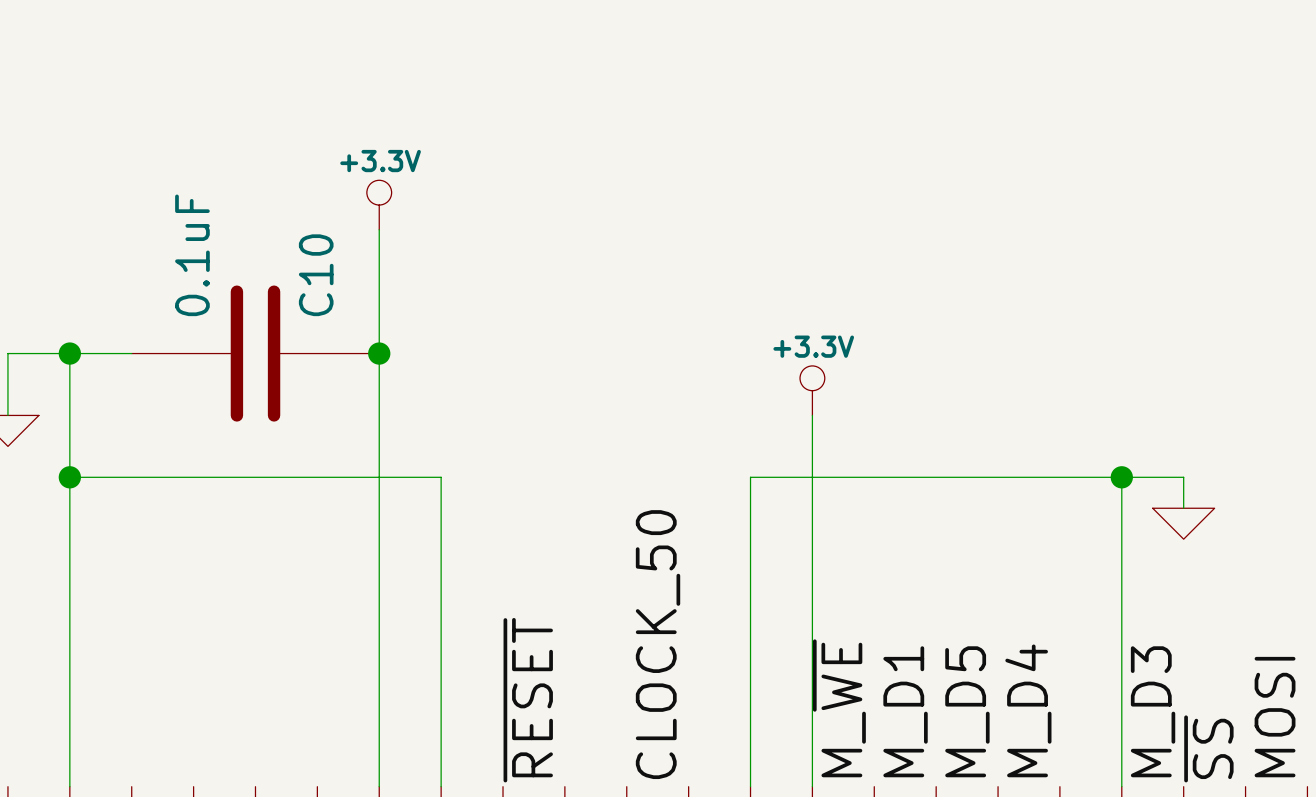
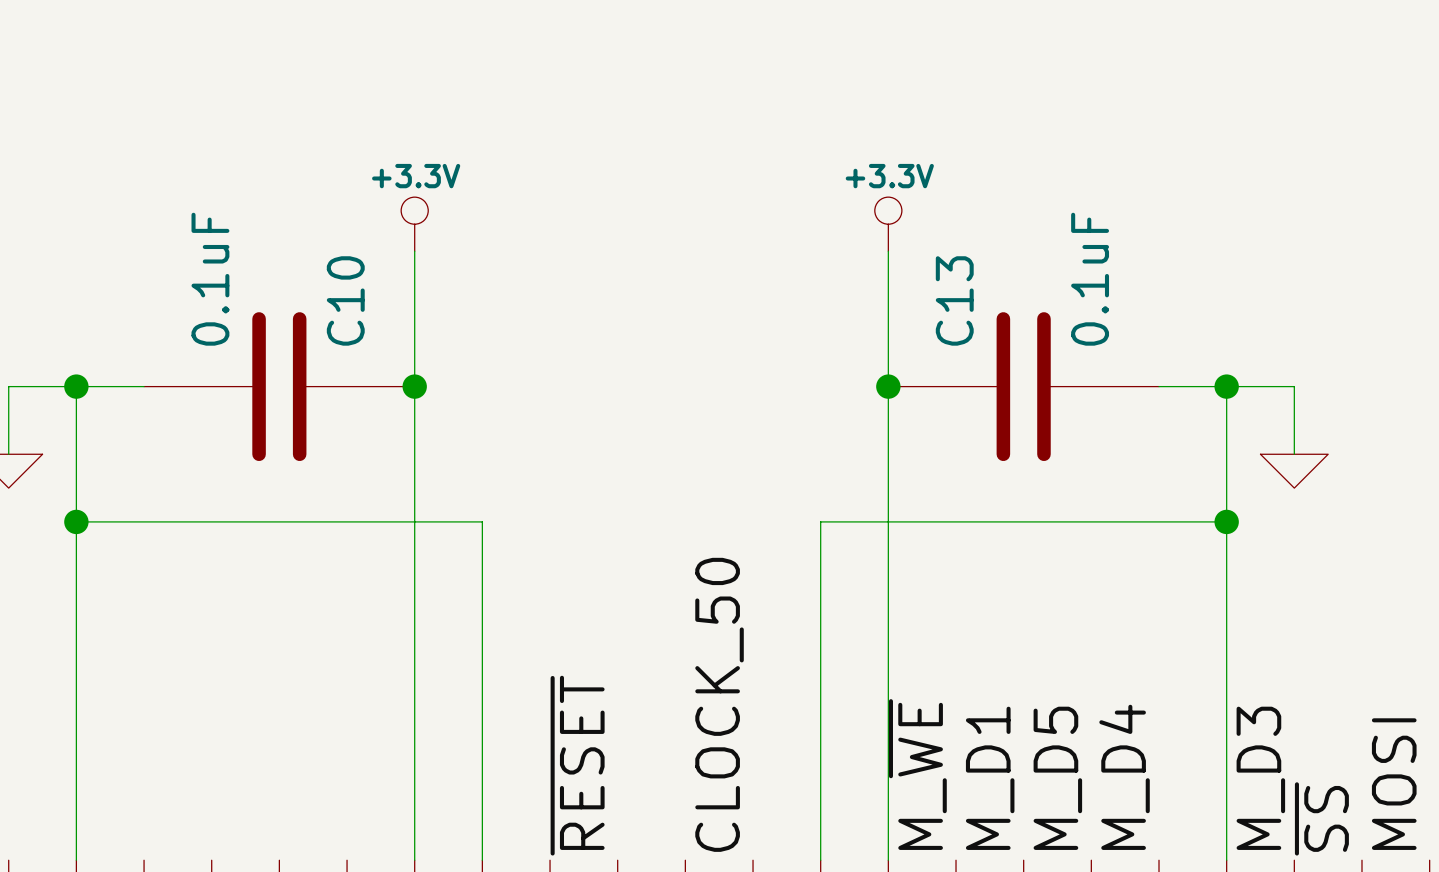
wire: none -> (888, 251) (888, 454)
junction: none -> (888, 386)
C13: none -> 0.1uF (1023, 386)
wire: none -> (1159, 386) (1294, 386) (1294, 454)
junction: none -> (1226, 386)
power symbol position: +3.3V (812, 390) -> +3.3V (888, 224)
wire: (1121, 477) (1183, 477) (1183, 508) -> (1226, 521) (1226, 386)
power symbol position: (1183, 523) -> (1294, 471)

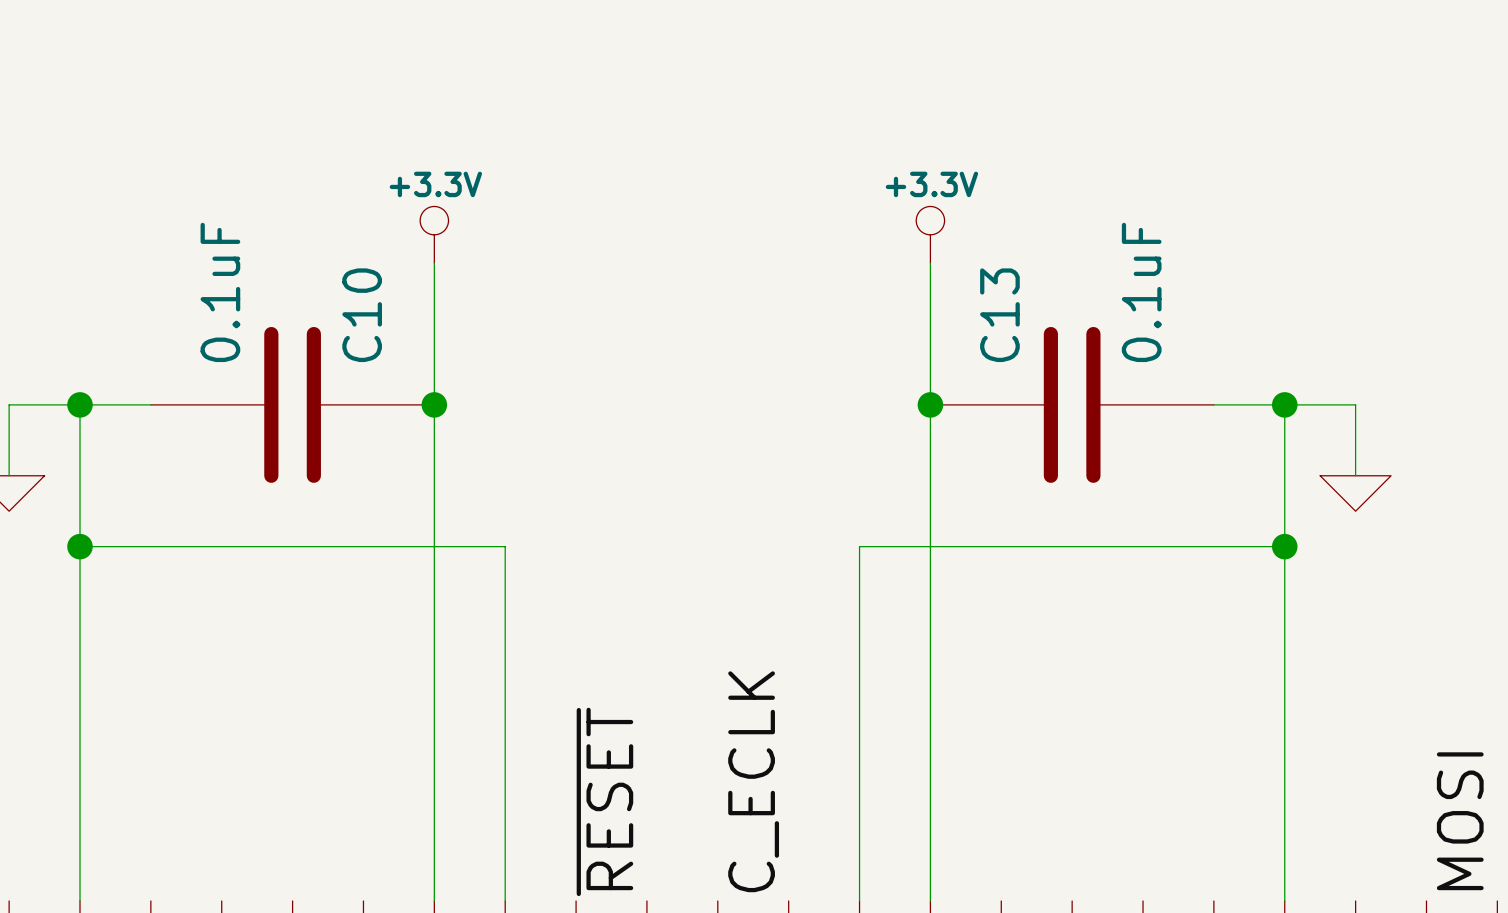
label: CLOCK_50 (719, 704) -> C_ECLK (753, 781)
label: M_~{WE} (917, 774) -> none
label: M_D4 (1124, 777) -> none
label: M_D1 (990, 778) -> none
label: M_D5 (1057, 778) -> none
label: M_D3 (1260, 778) -> none
label: ~{SS} (1321, 818) -> none

